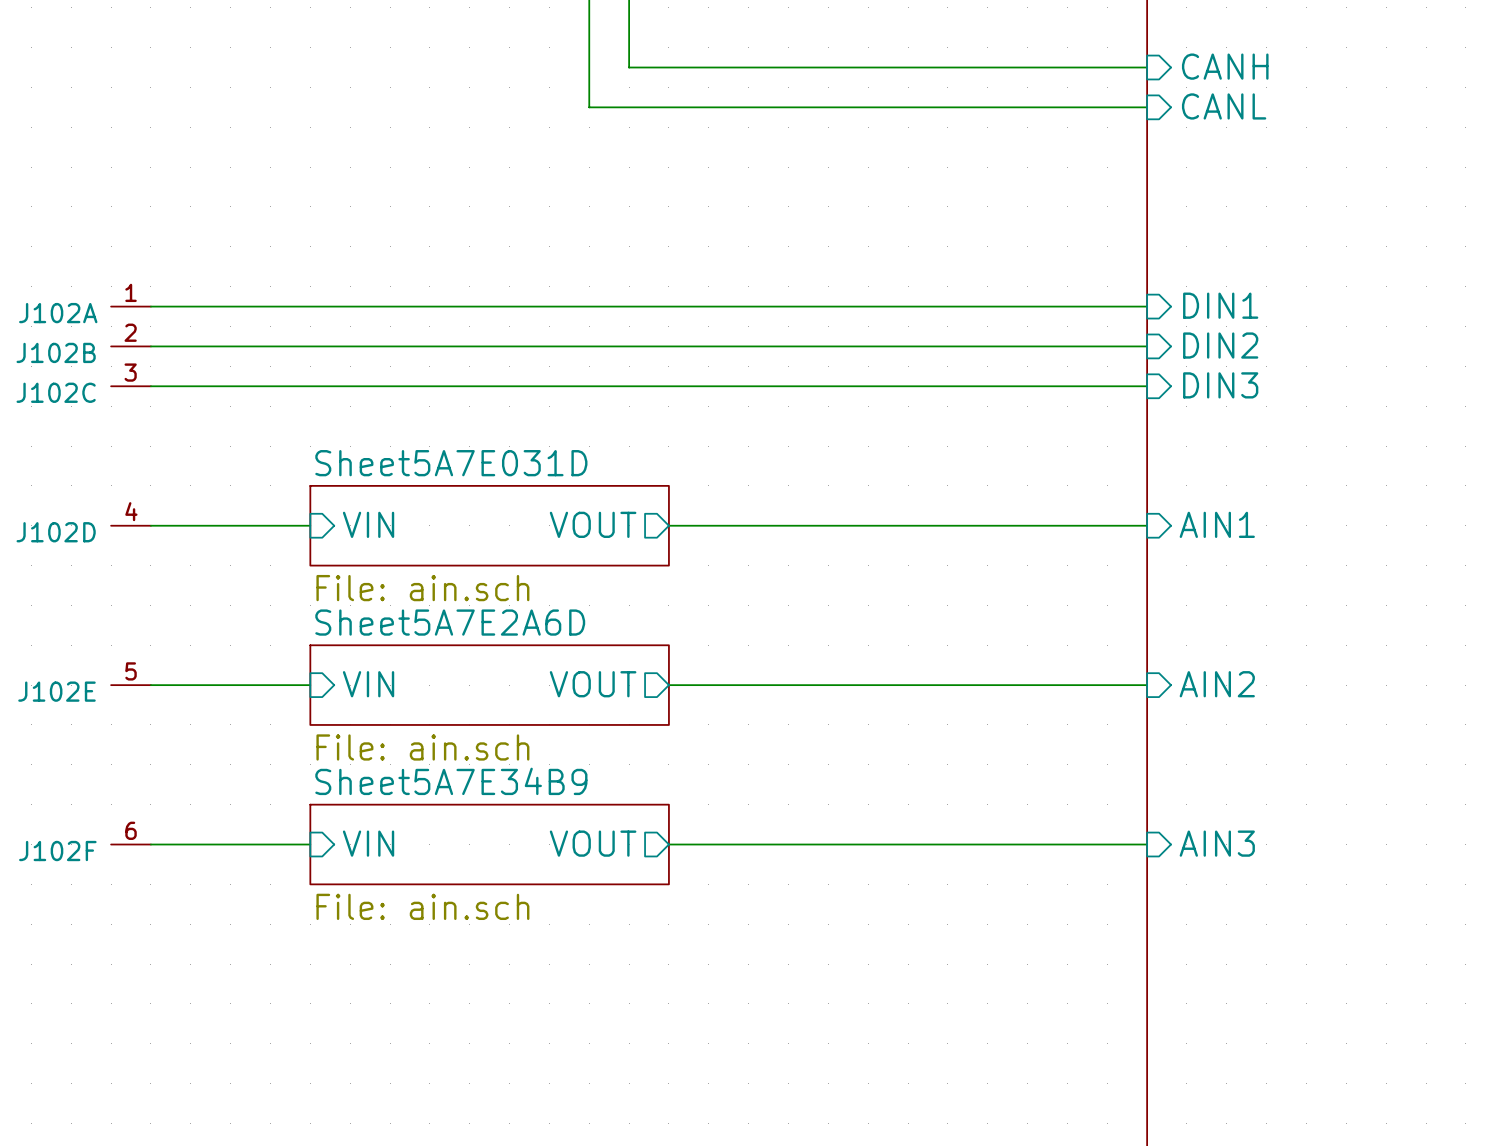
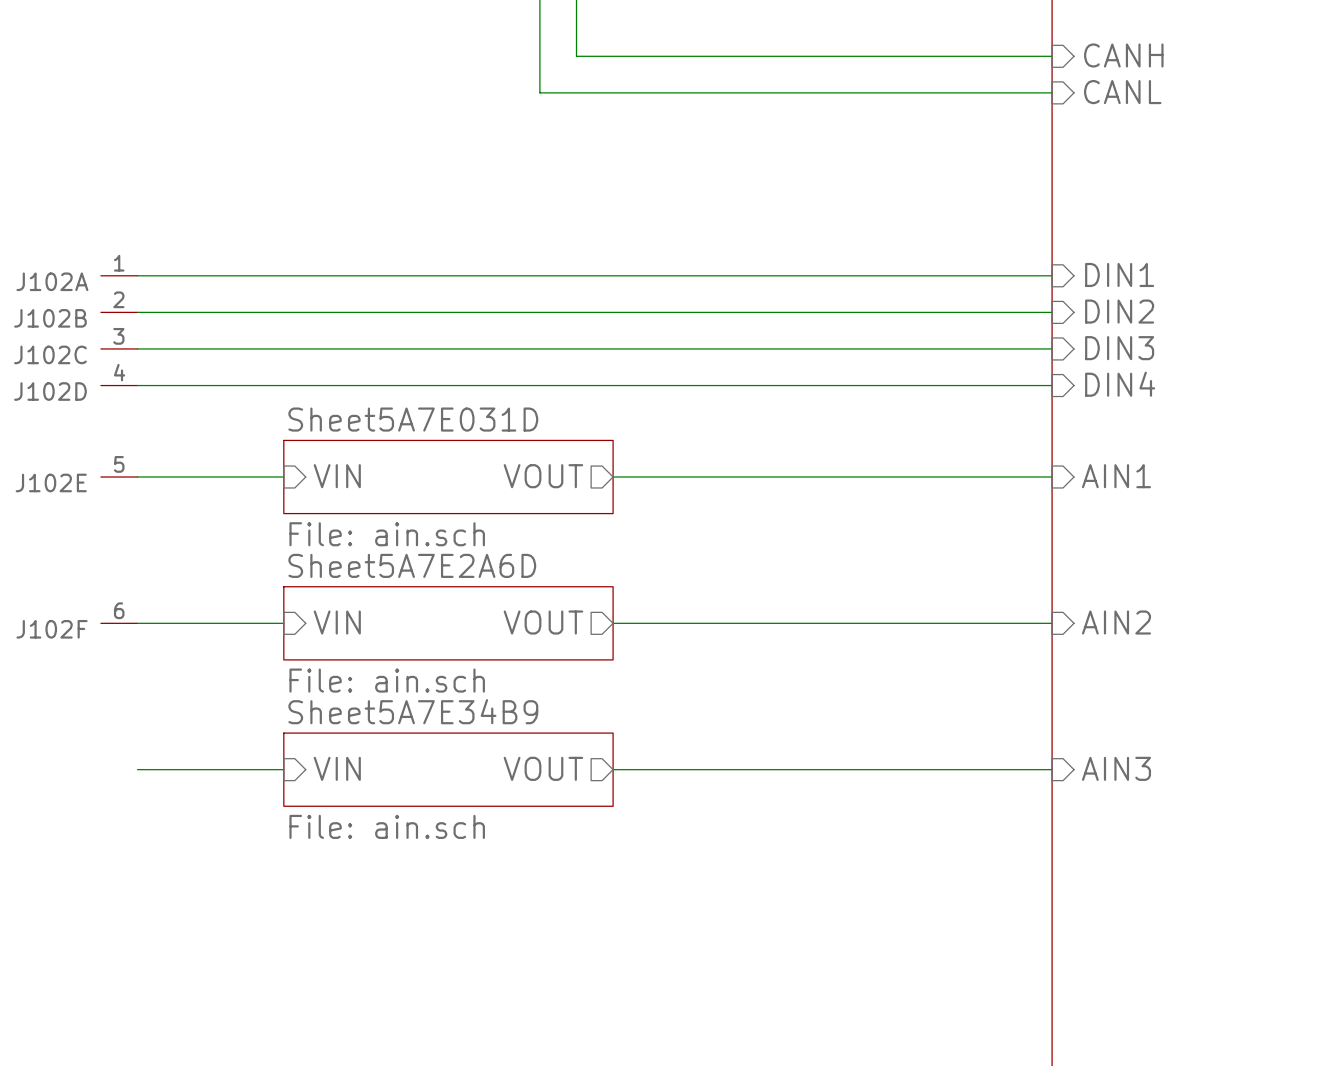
sheet pin: none -> DIN4 (1120, 384)
wire: none -> (137, 385) (1052, 385)
J102D position: (131, 525) -> (119, 385)
J102E position: (131, 685) -> (119, 477)
J102F position: (131, 844) -> (119, 623)

